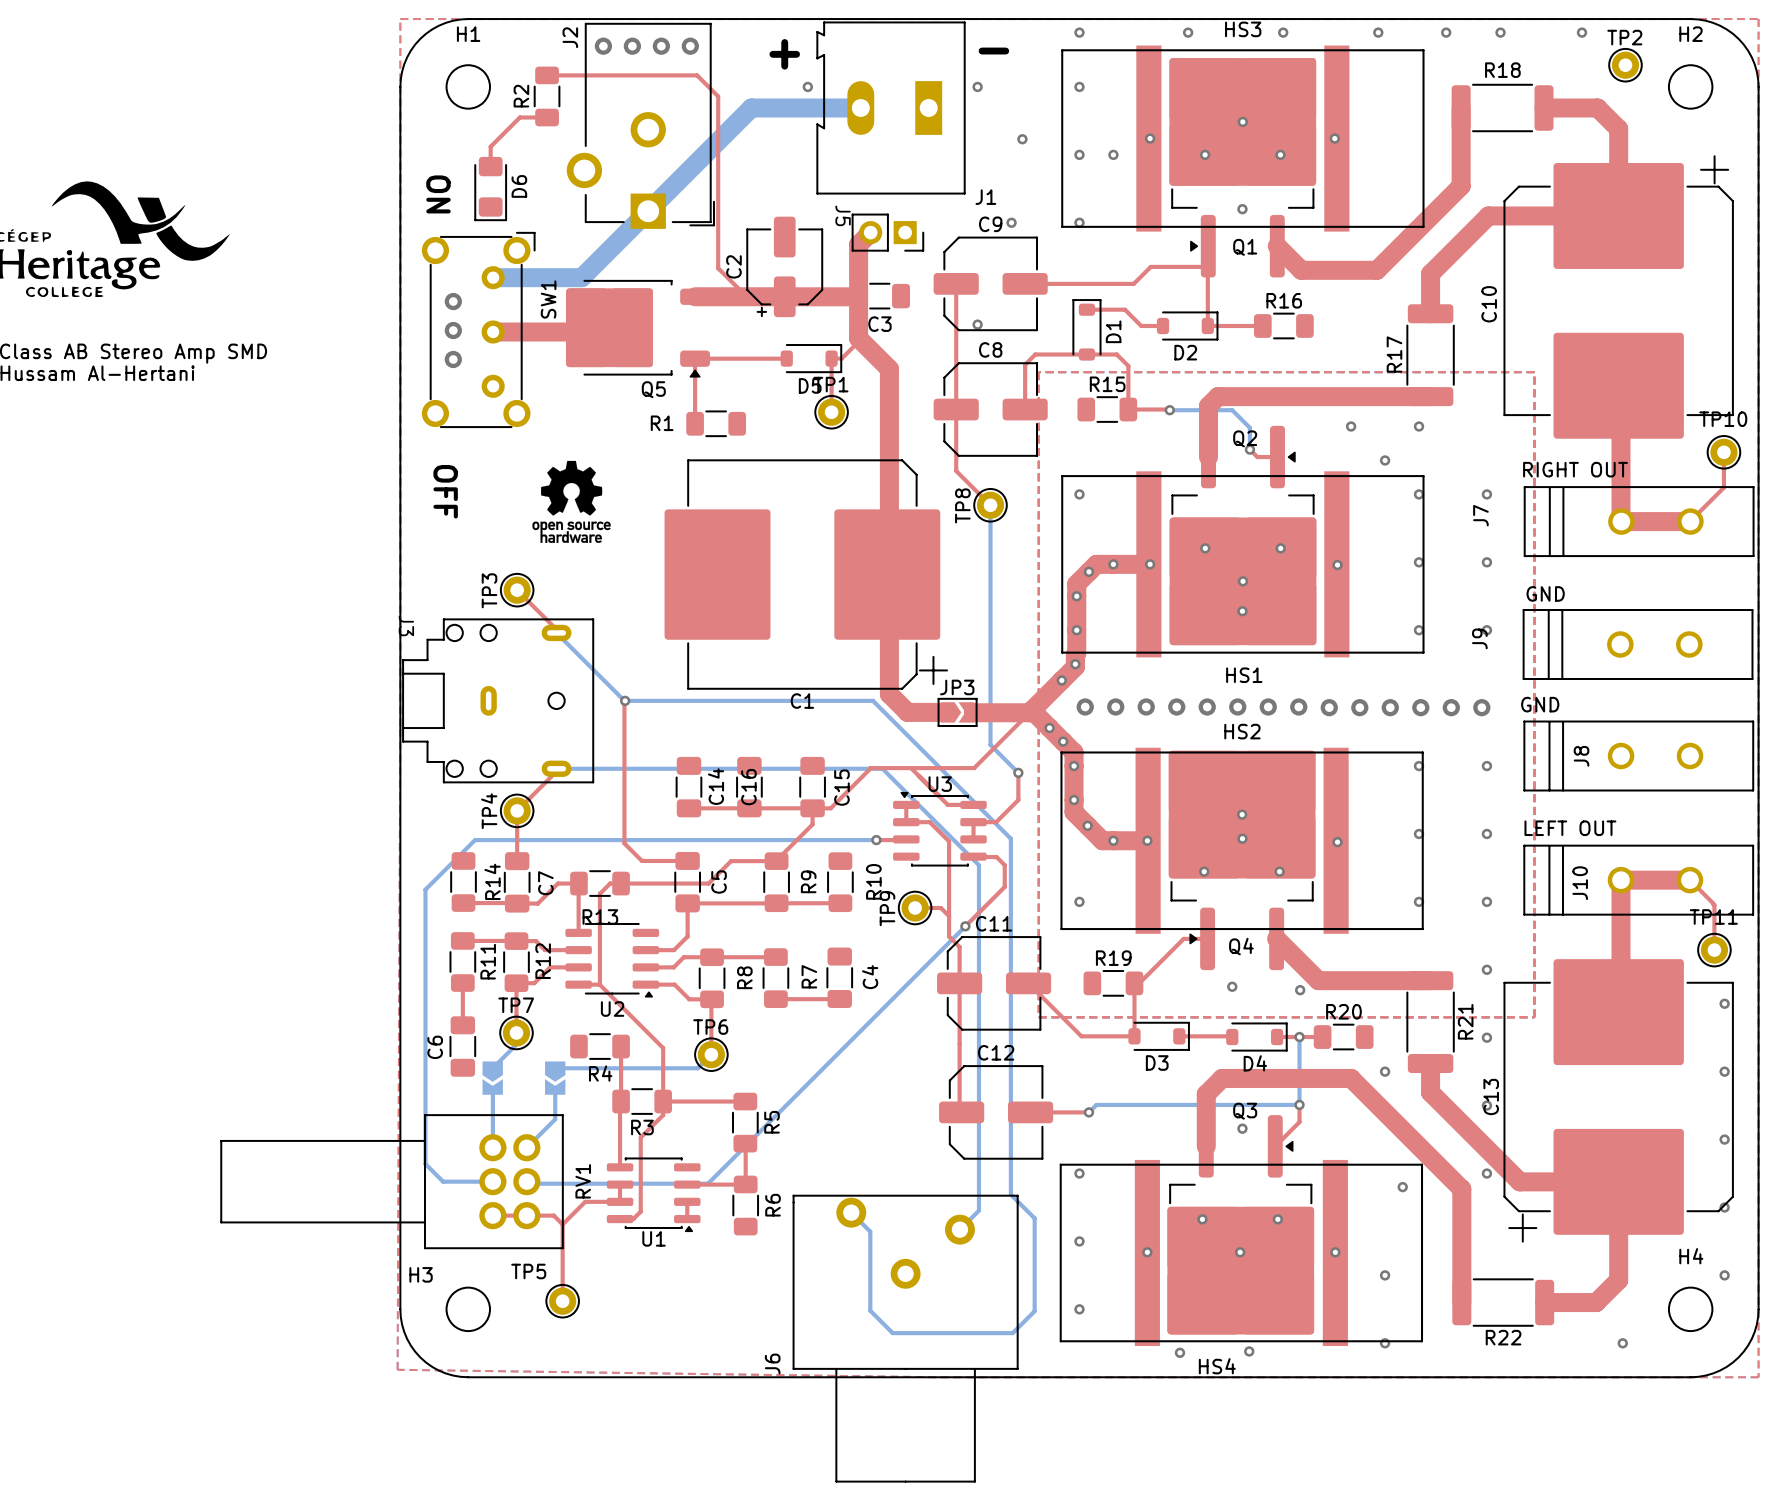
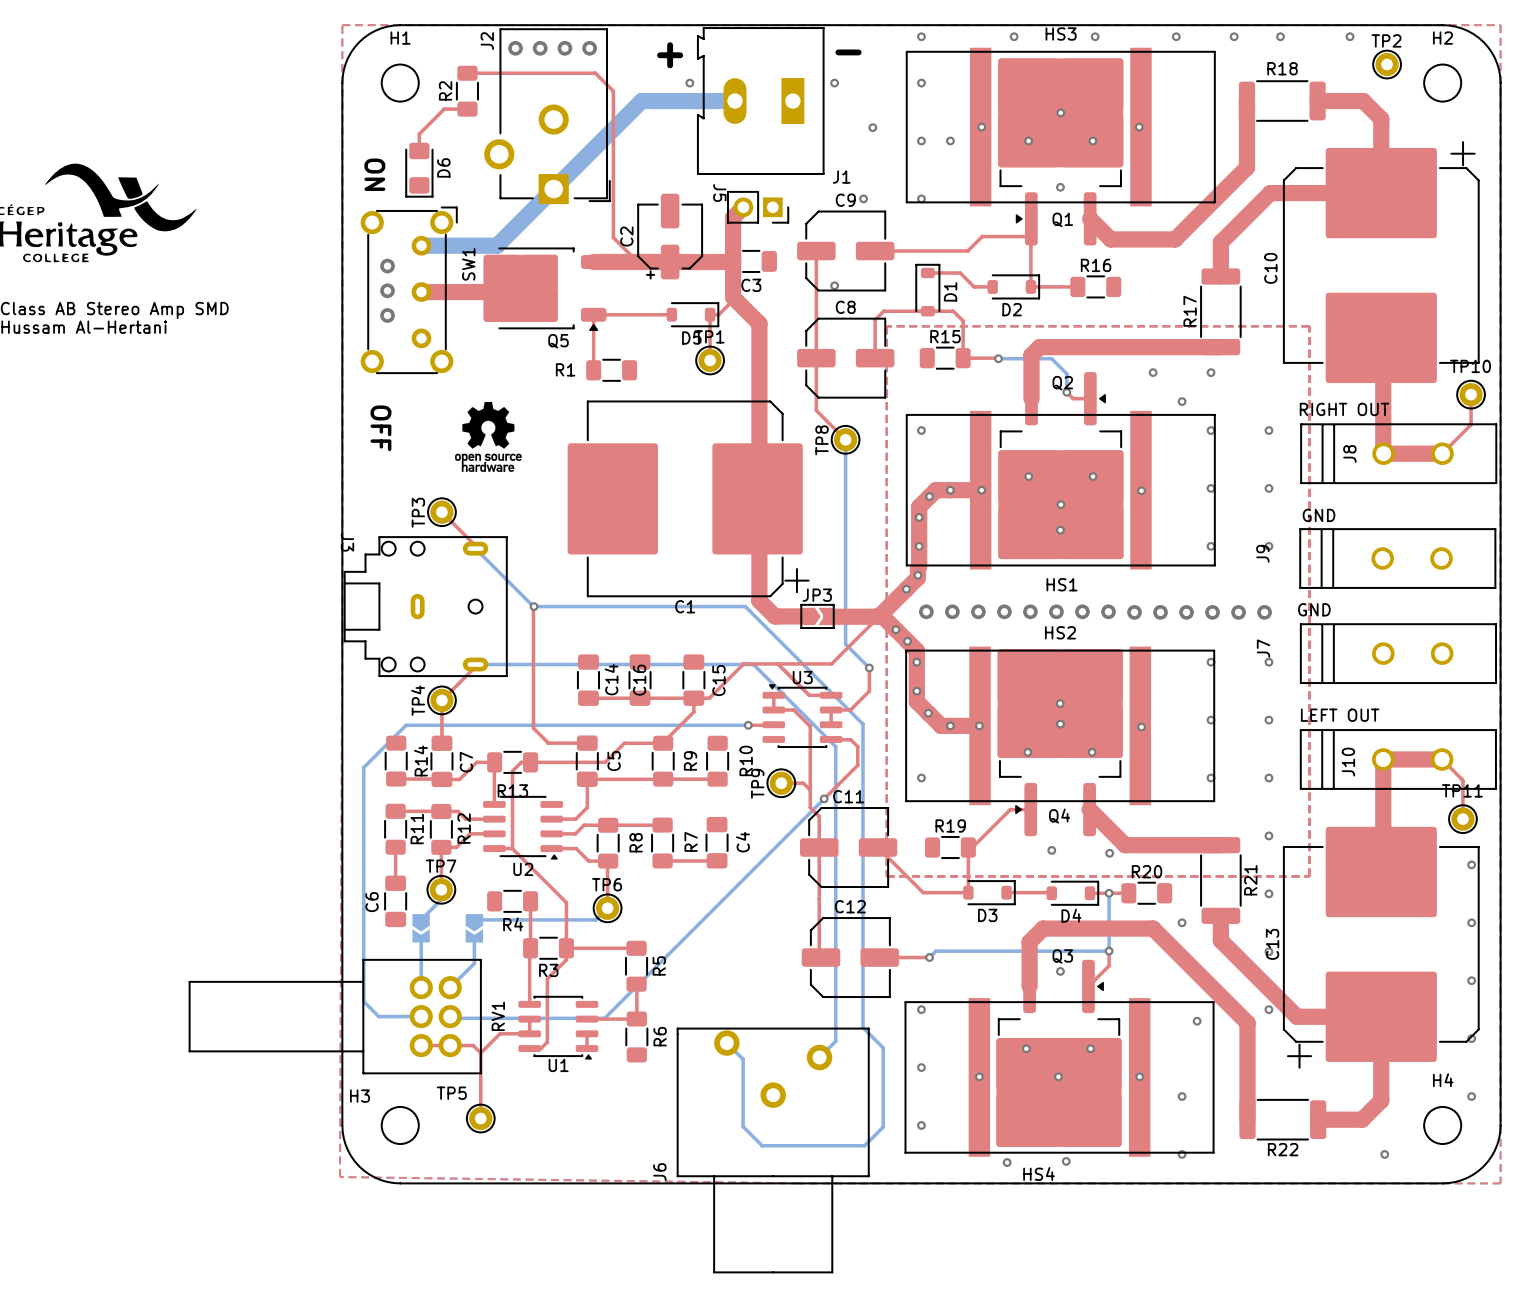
J7 name: J7 (1480, 515) -> J8 (1349, 453)
J8 name: J8 (1581, 756) -> J7 (1263, 648)

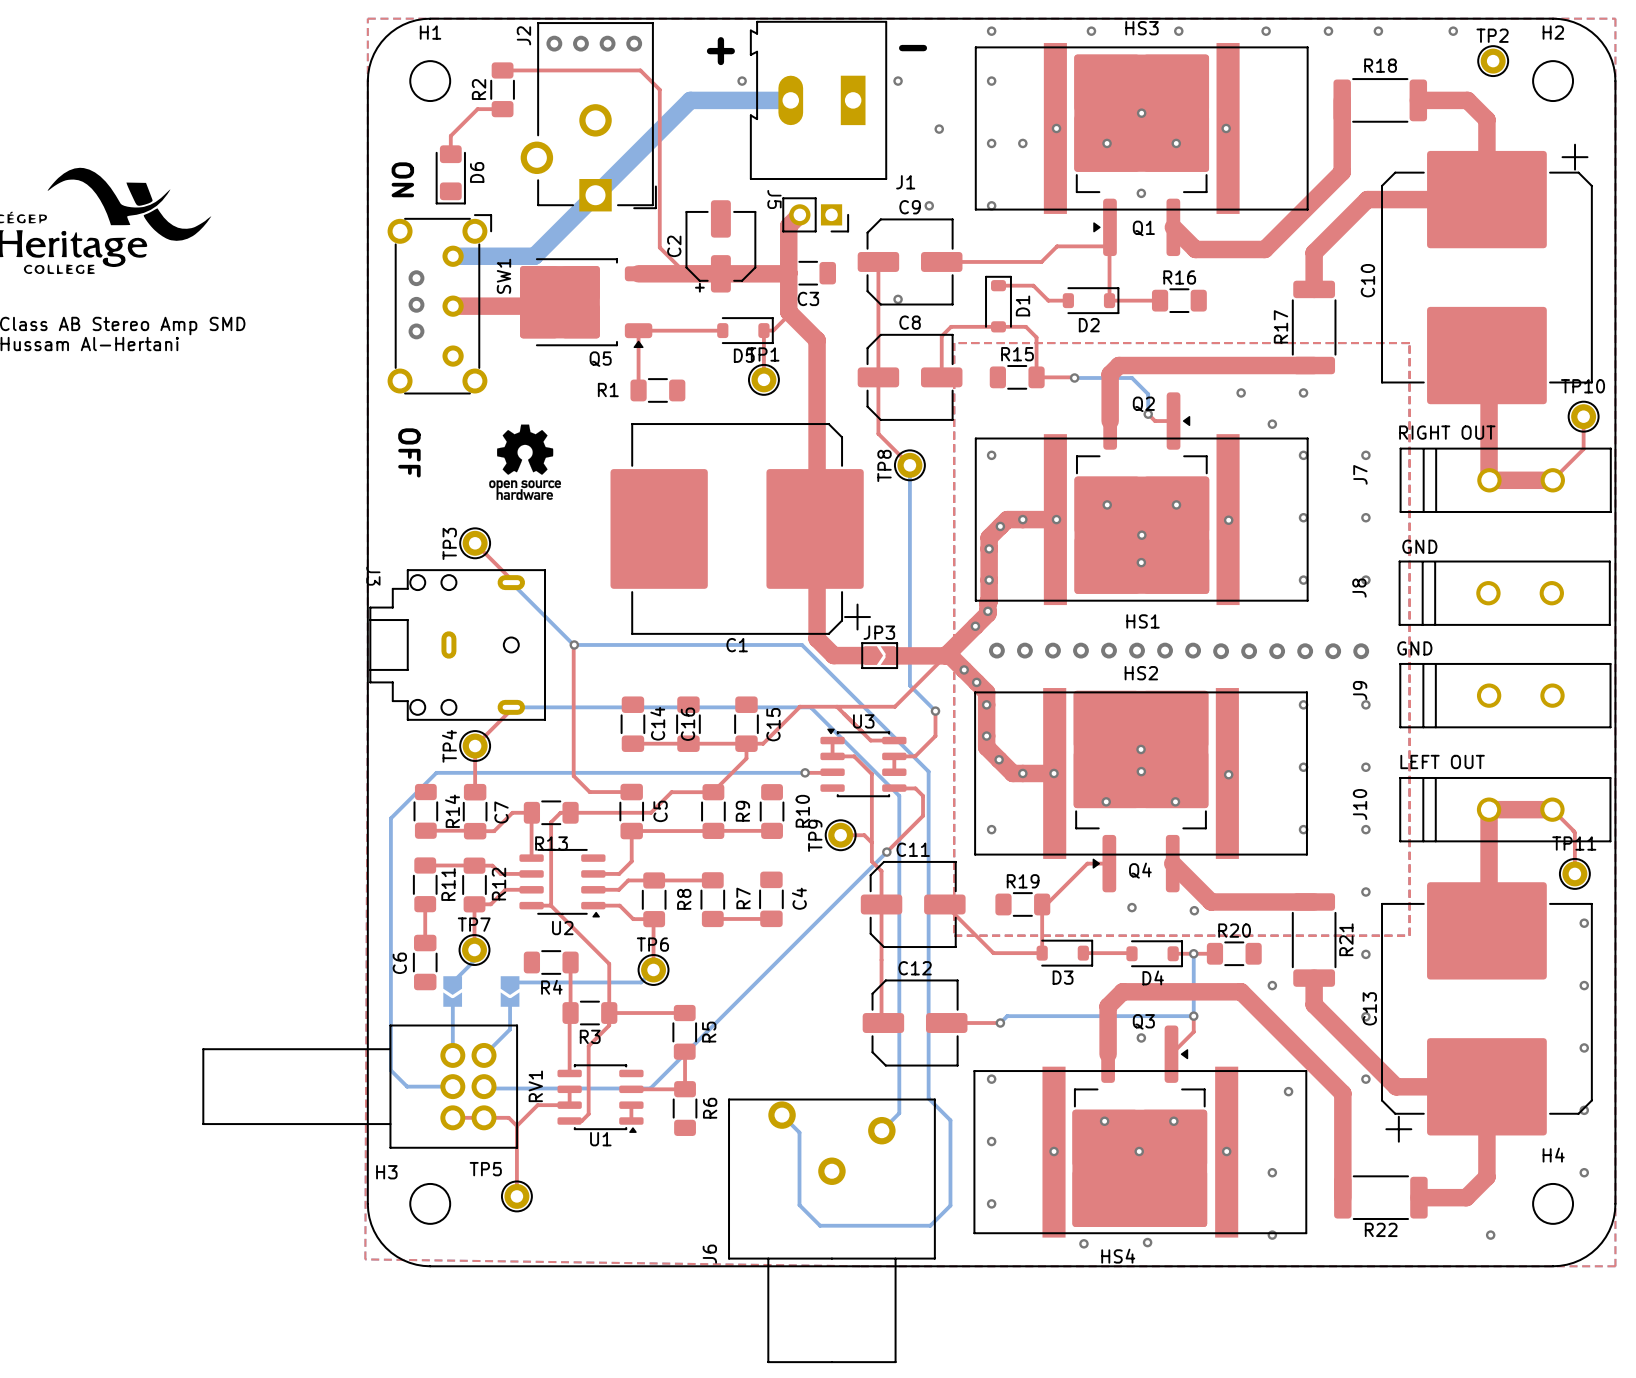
J8 name: J8 (1349, 453) -> J7 (1360, 474)
J9 name: J9 (1262, 553) -> J8 (1359, 588)
J7 name: J7 (1263, 648) -> J9 (1360, 690)
J10 name position: J10 (1348, 762) -> J10 (1360, 804)

